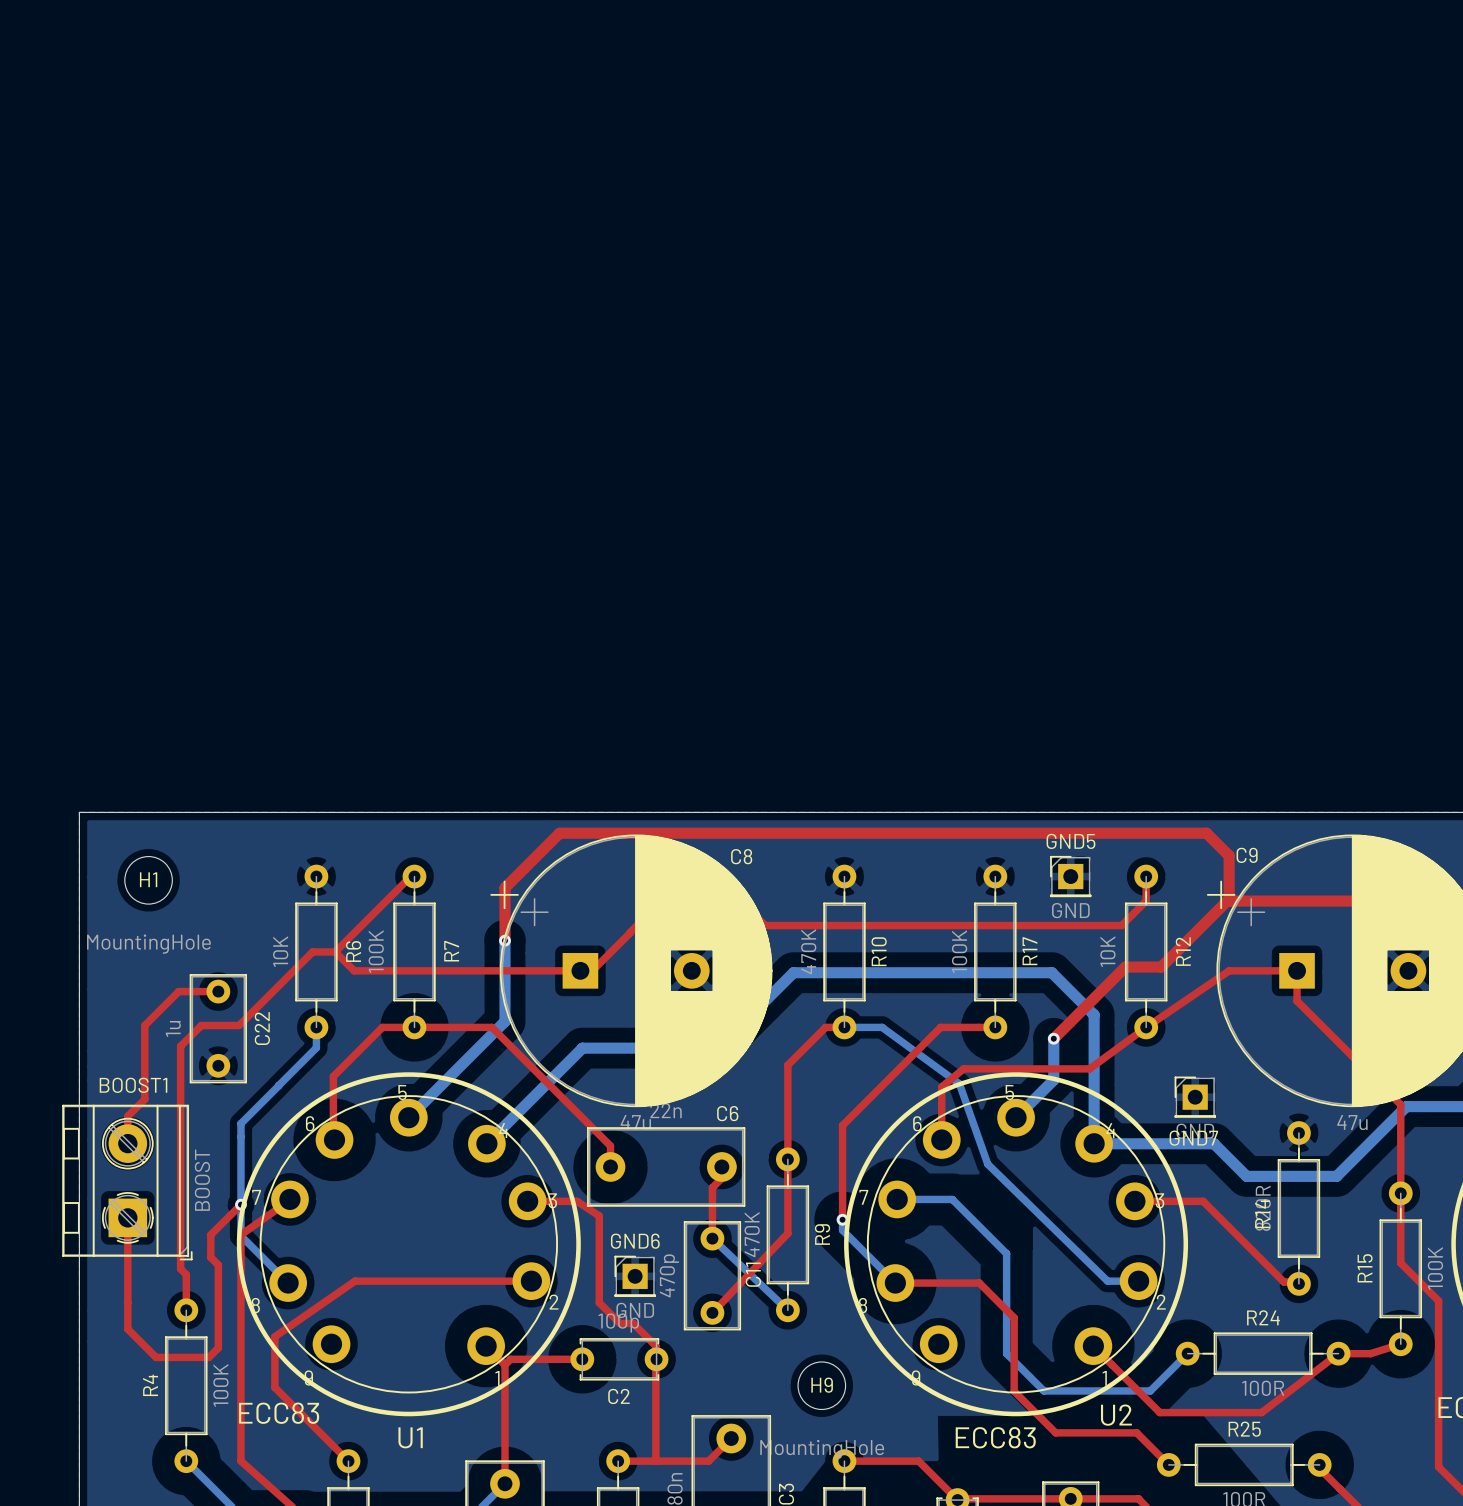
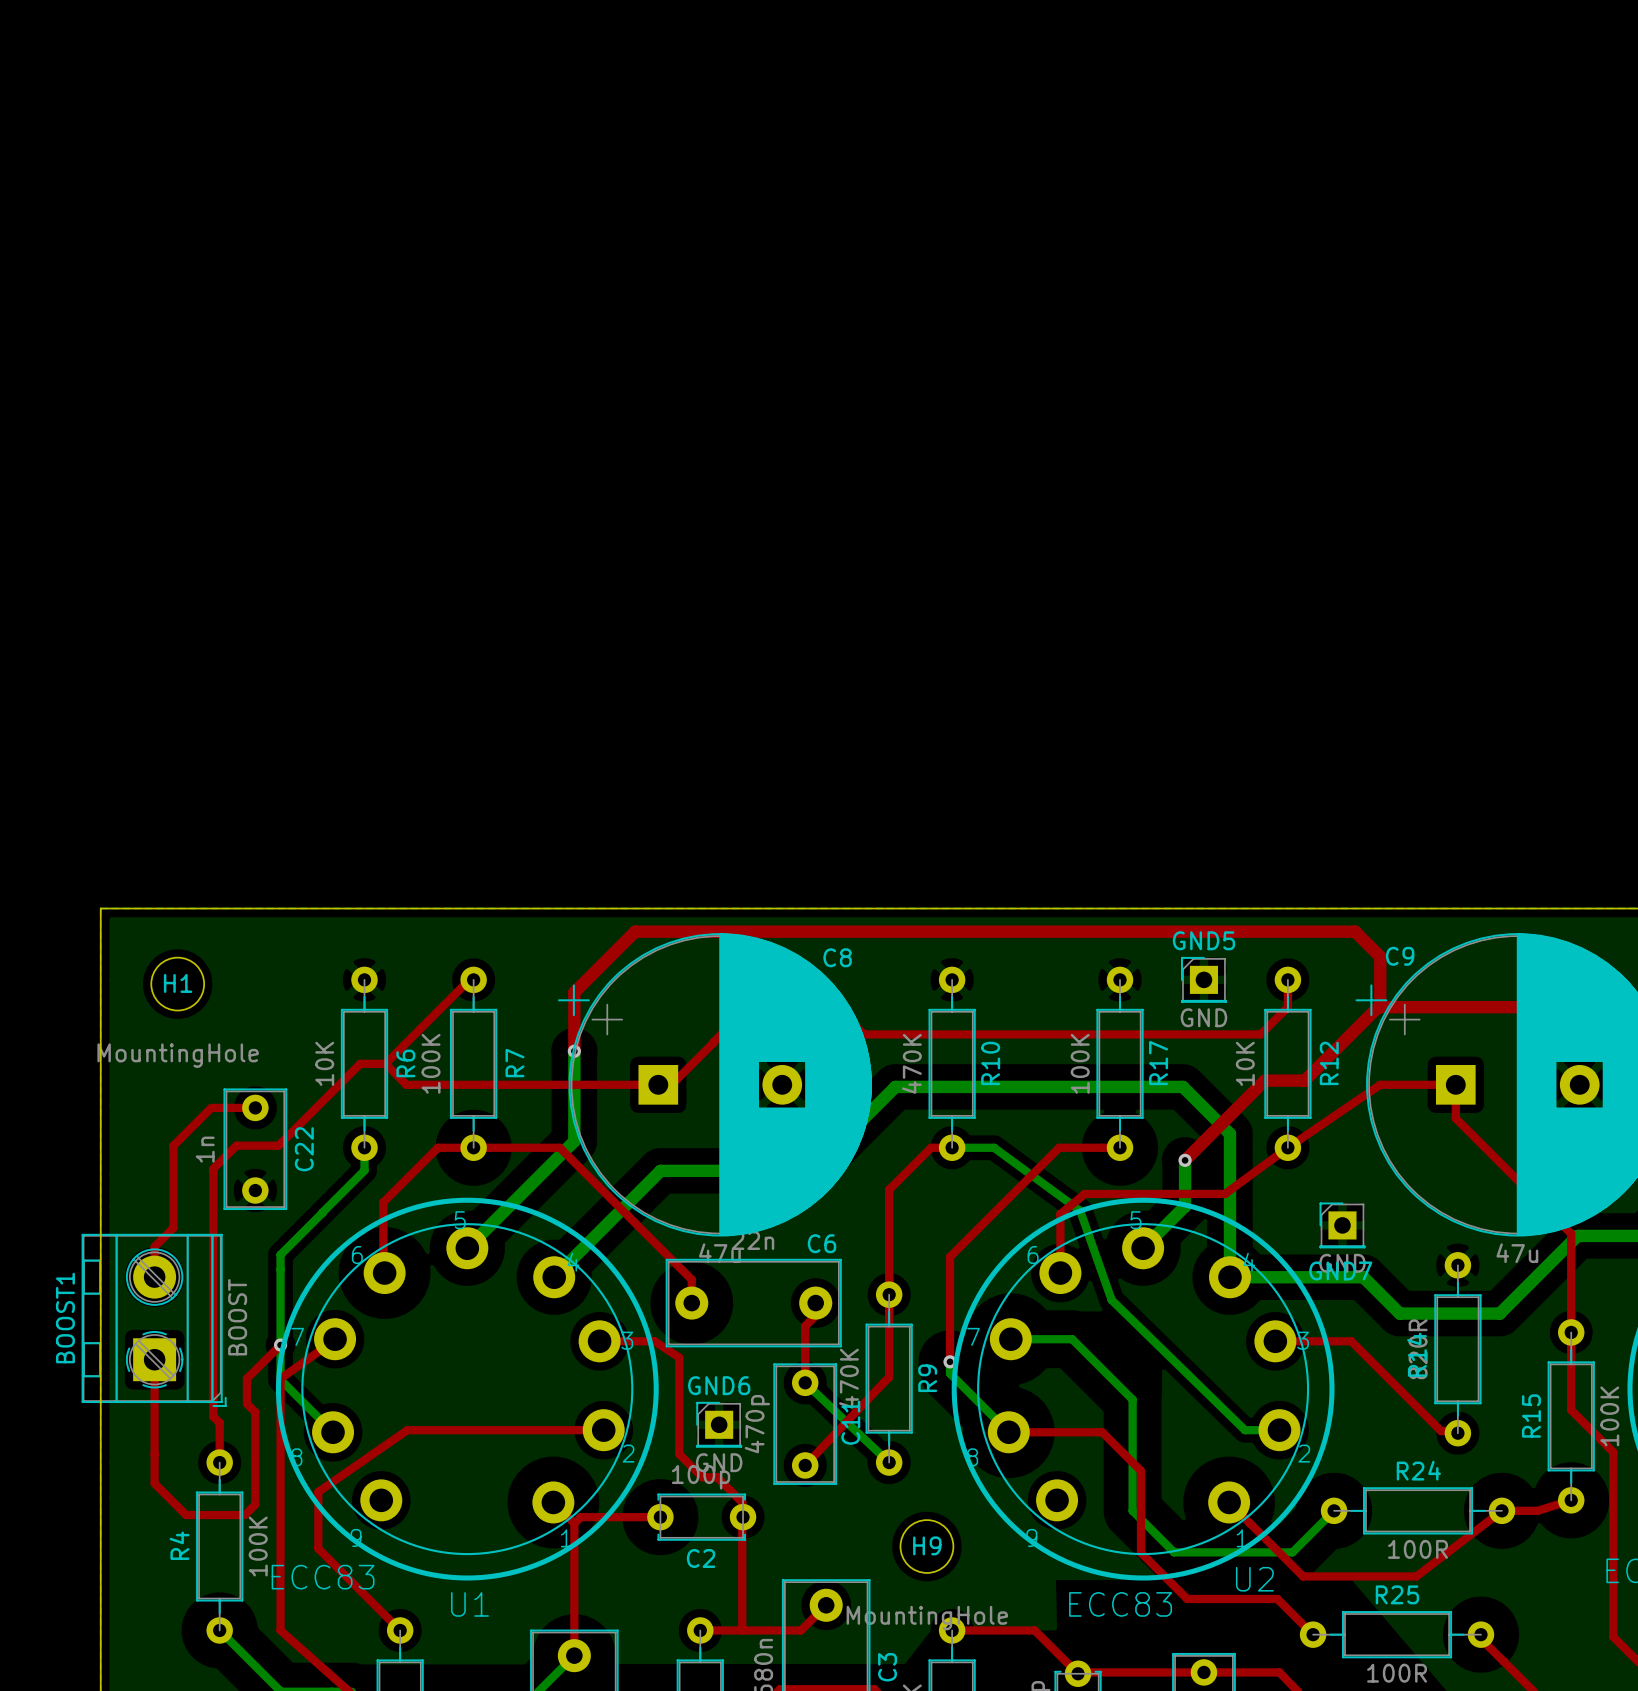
C22 value: 1u (173, 1028) -> 1n (205, 1149)
BOOST1 name rotation: 0° (133, 1085) -> 90° counterclockwise (65, 1318)
BOOST1 name position: BOOST1 (133, 1085) -> BOOST1 (65, 1318)

